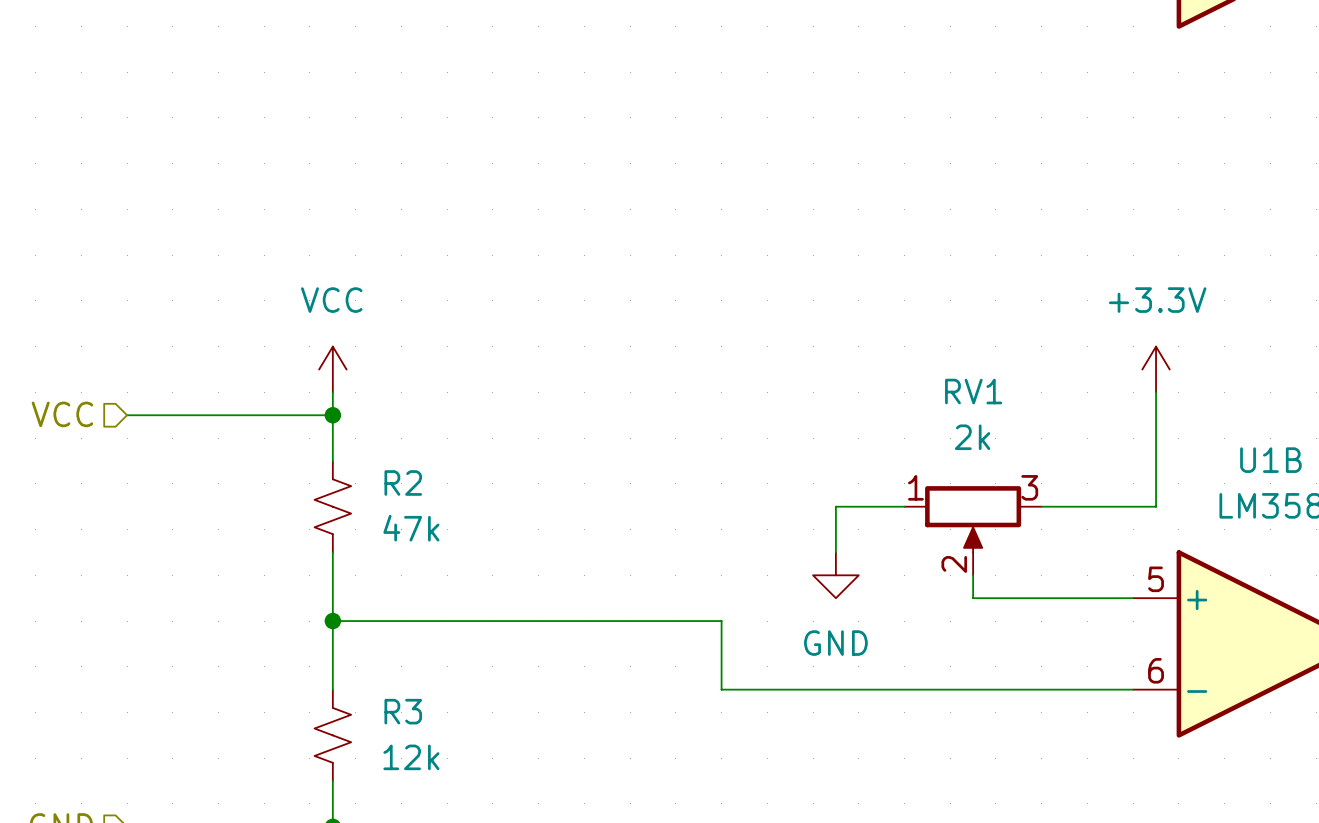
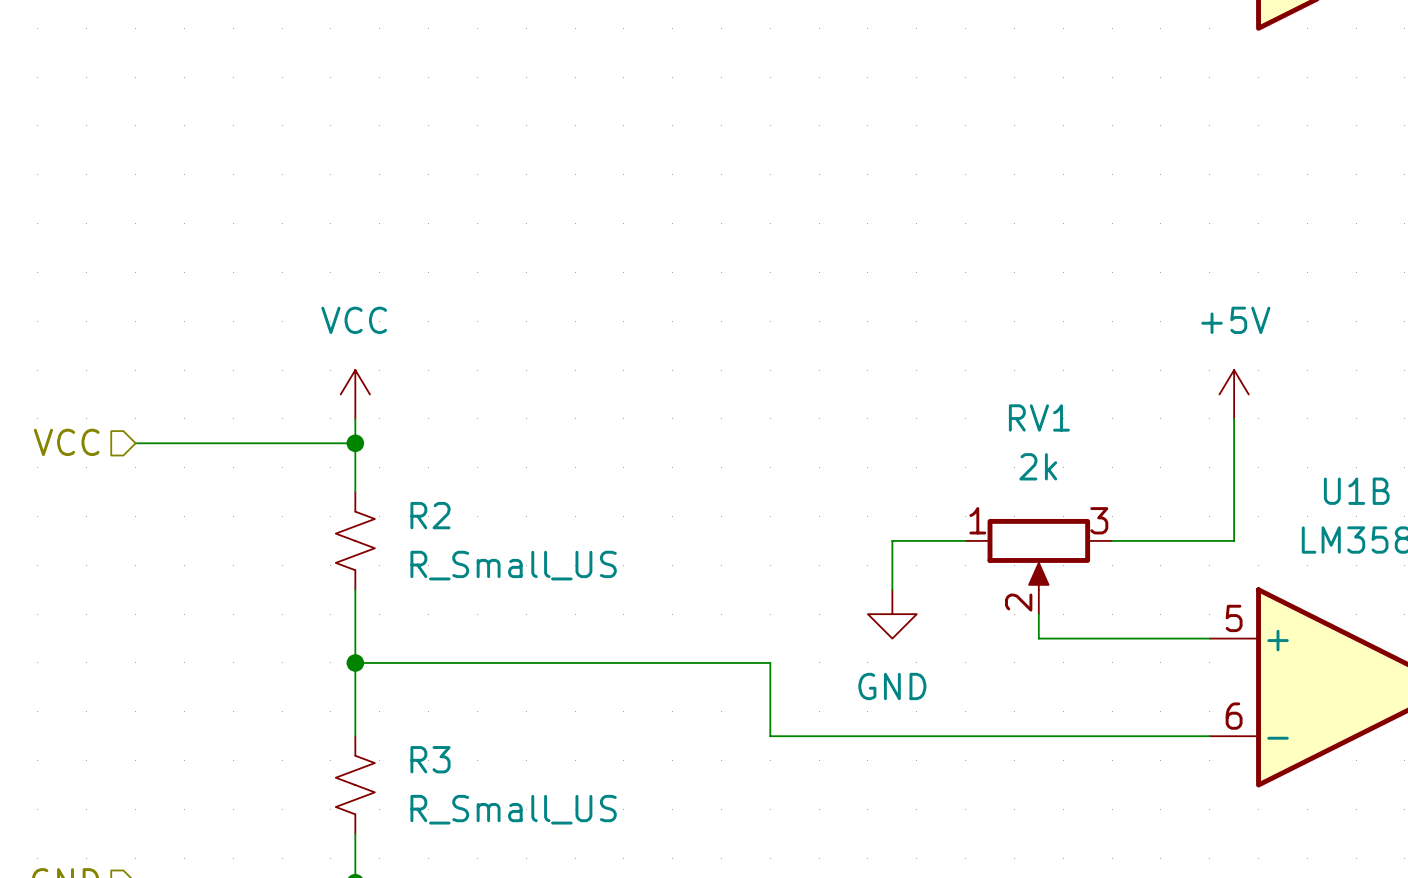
power symbol: +3.3V (1156, 369) -> +5V (1234, 394)
R2 value: 47k (411, 528) -> R_Small_US (513, 565)
R3 value: 12k (411, 757) -> R_Small_US (513, 809)

